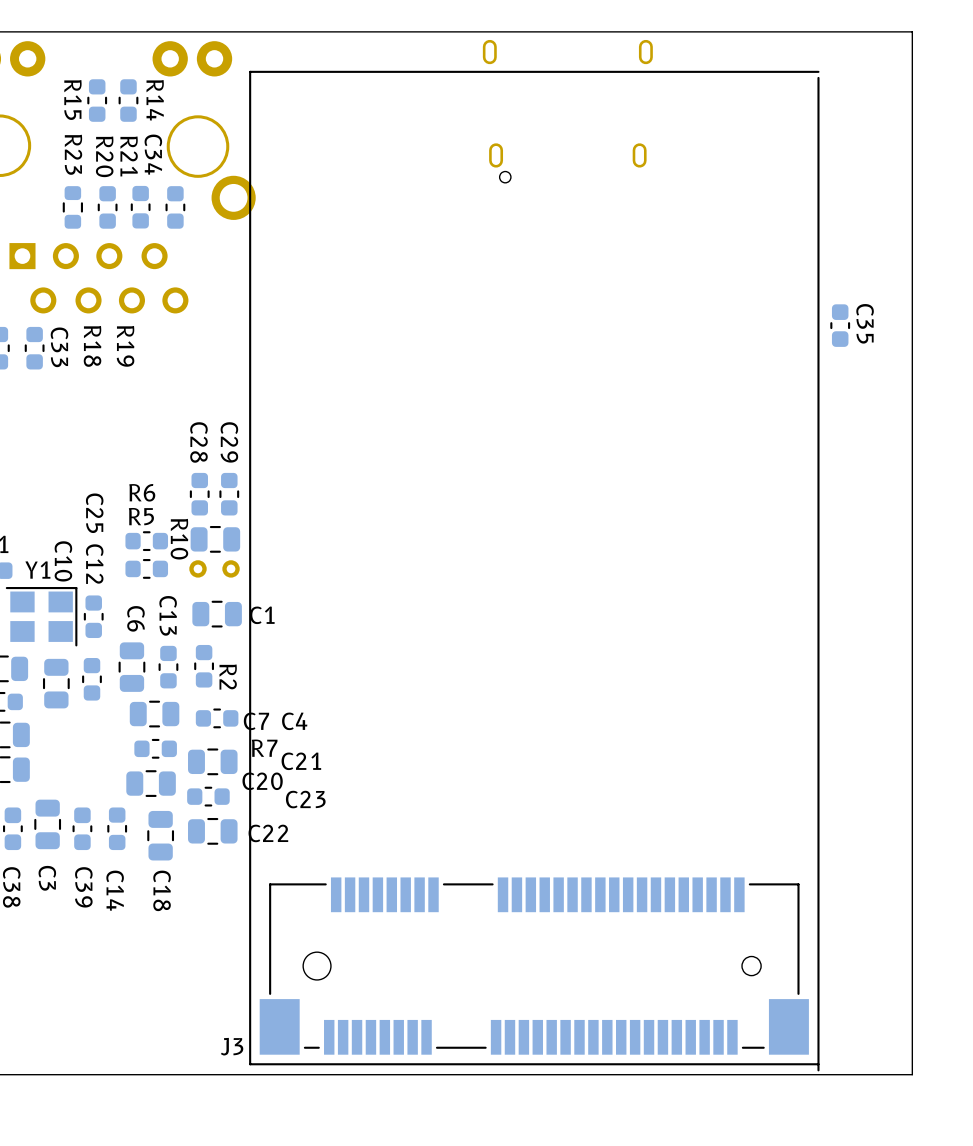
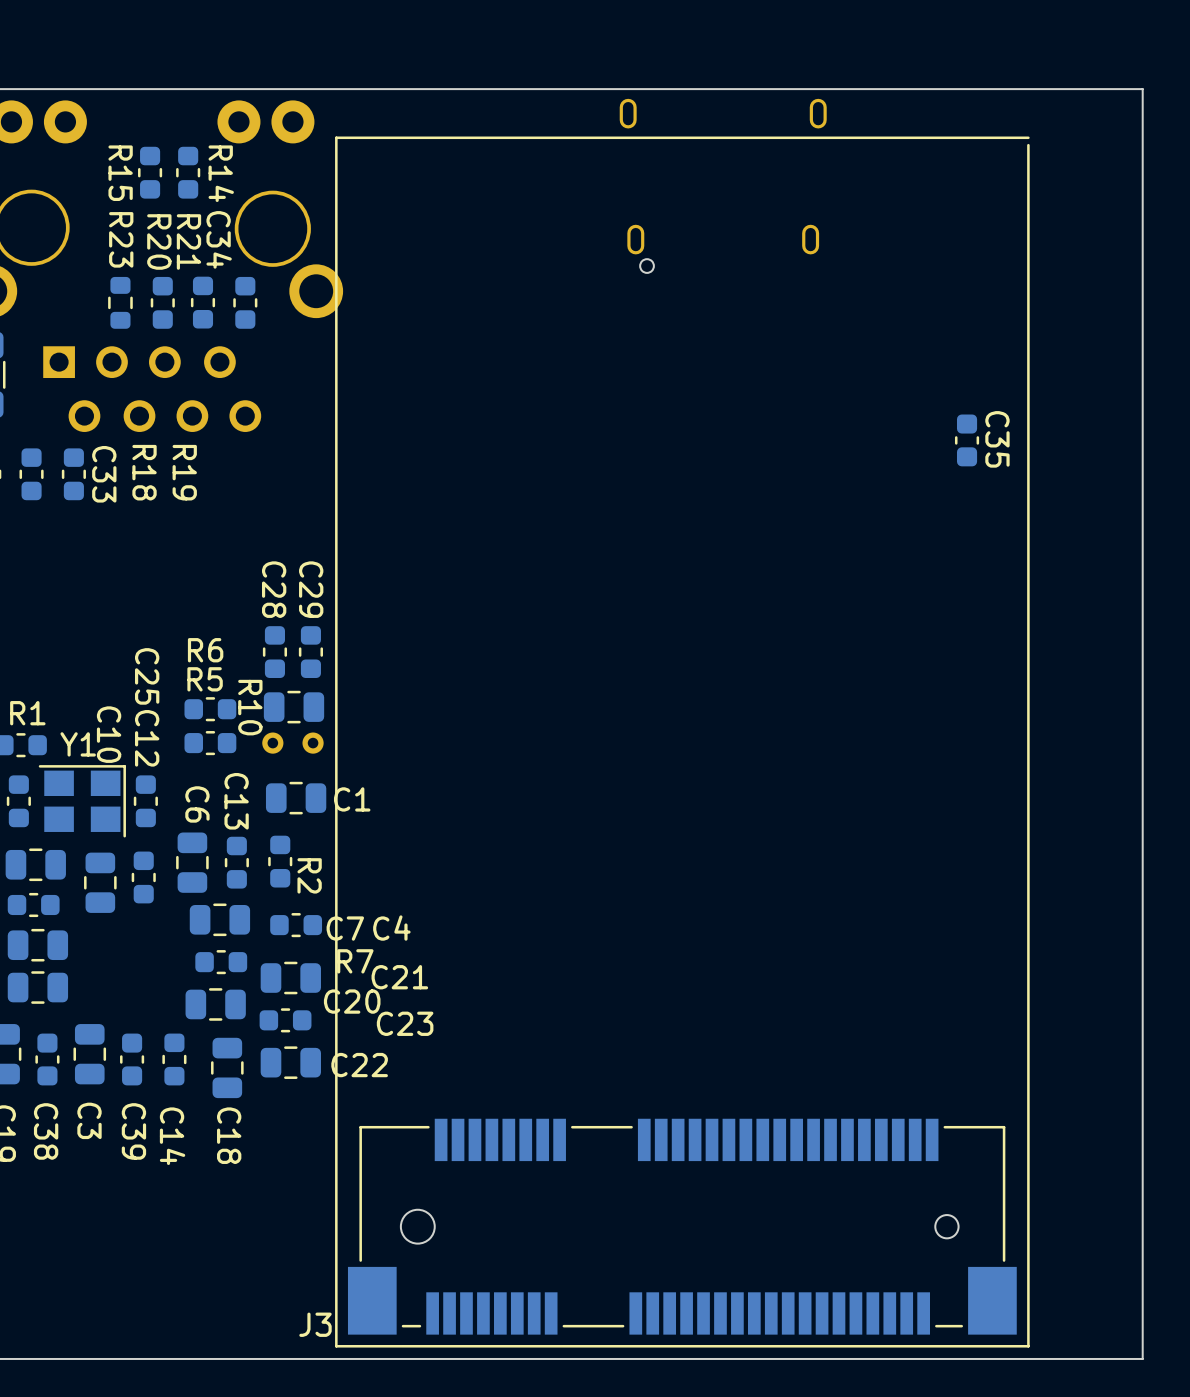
C35 position: (840, 325) -> (967, 440)
line: (818, 1064) (818, 1070) -> none

